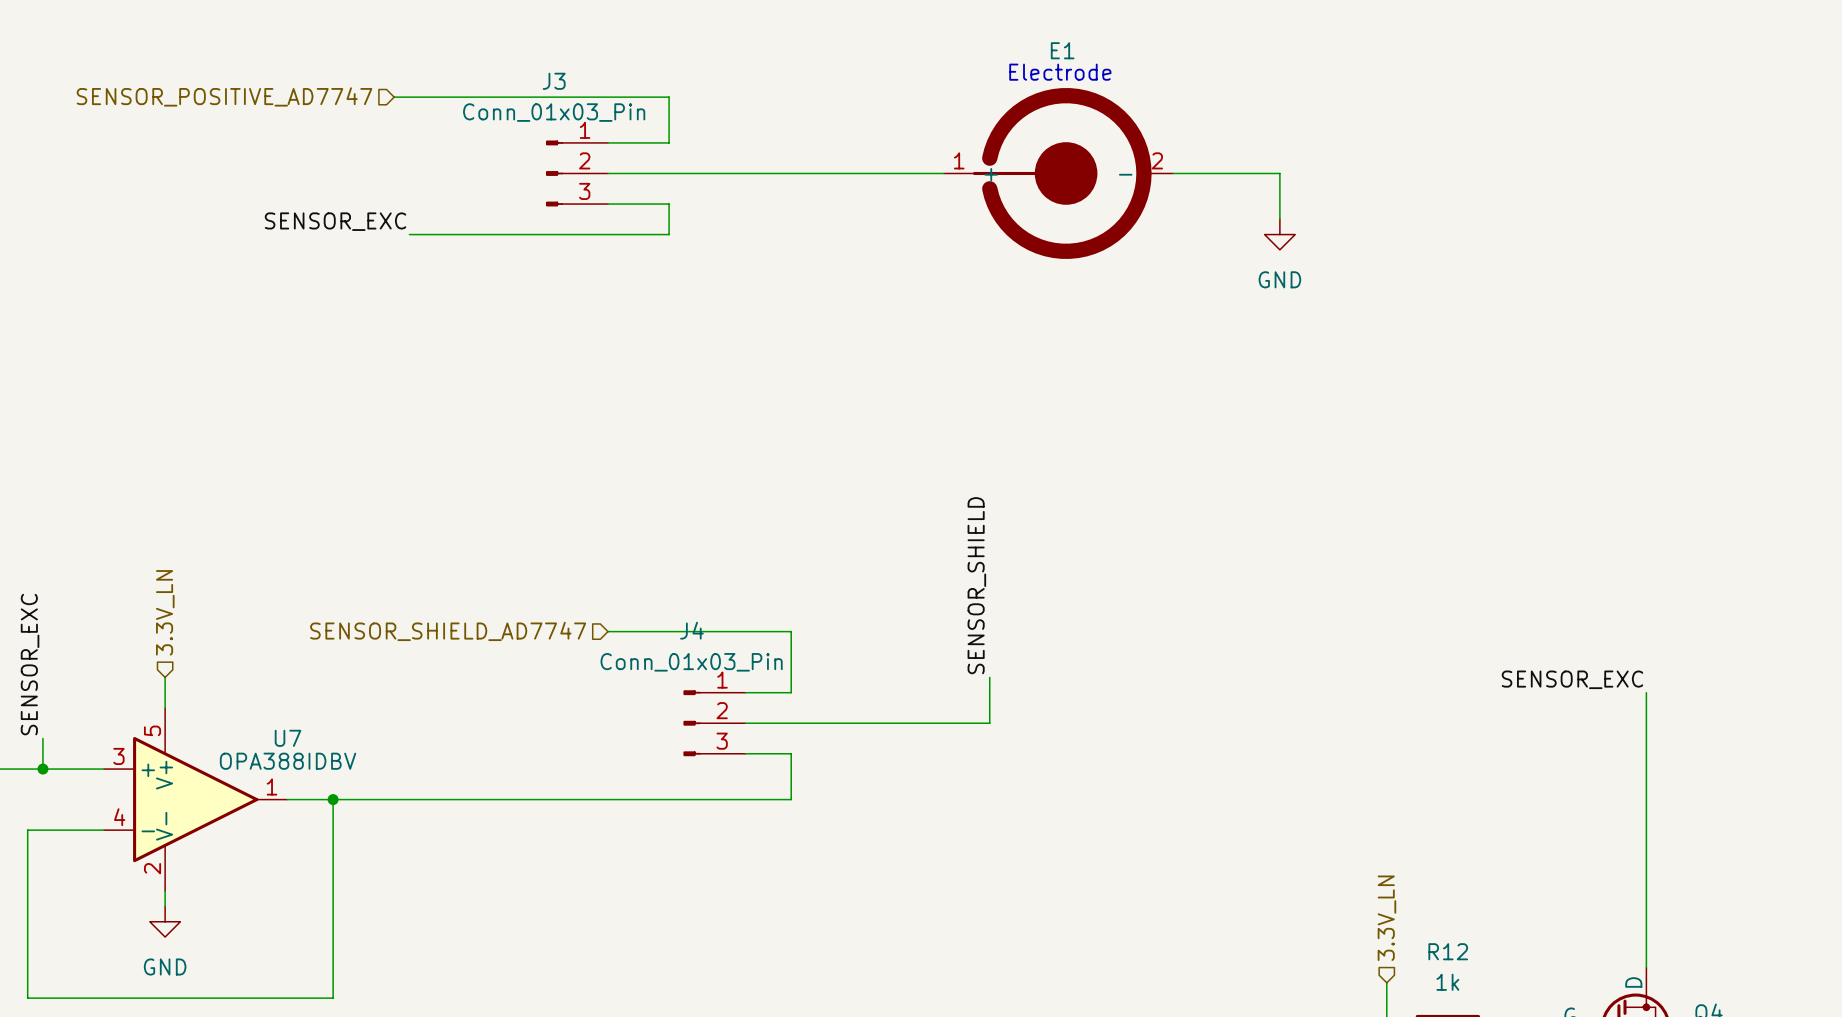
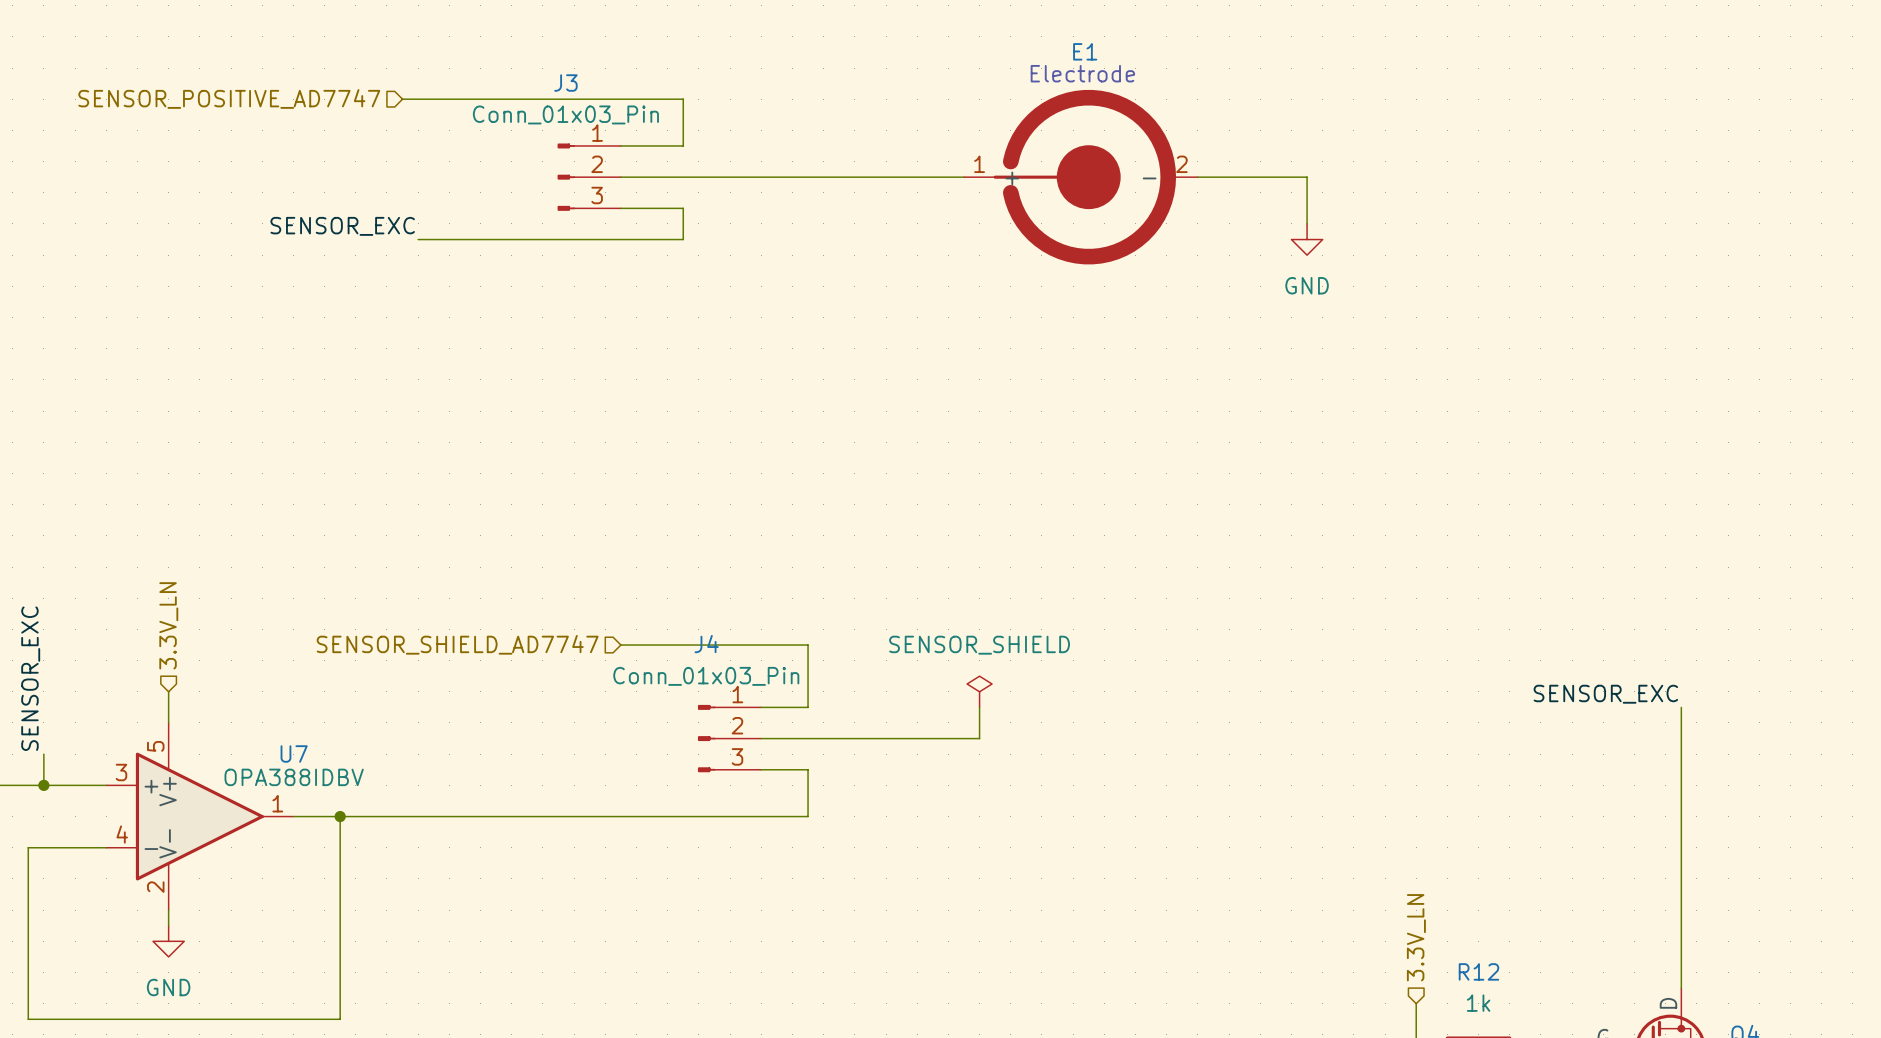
label: SENSOR_SHIELD (976, 585) -> none
power symbol: none -> SENSOR_SHIELD (979, 691)
wire: (989, 677) (989, 723) (959, 723) -> (979, 707) (979, 738)

